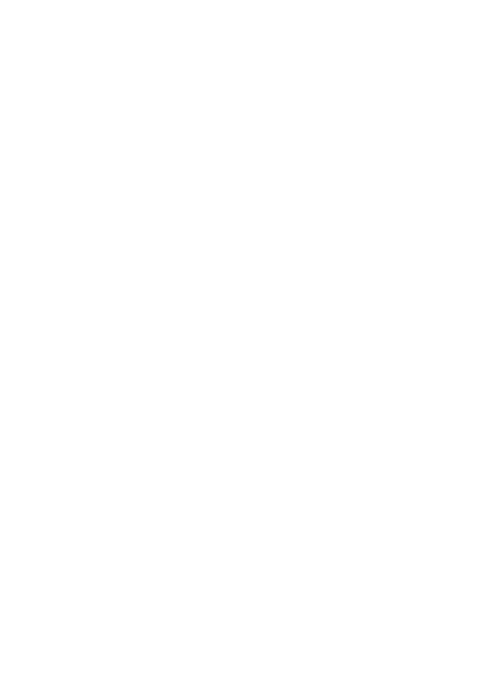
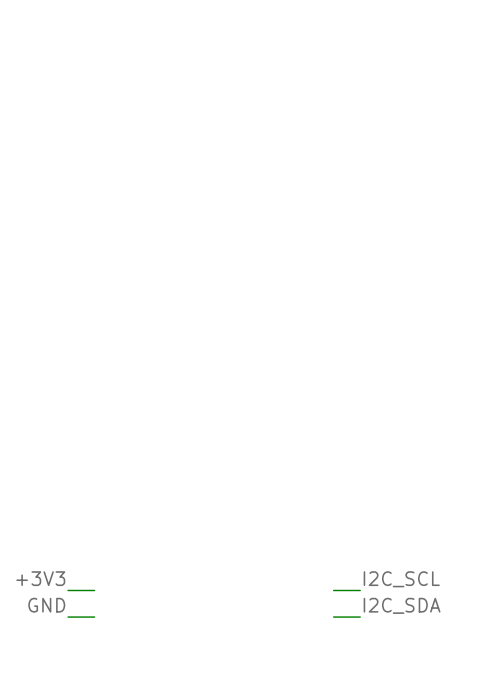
label: none -> +3V3 (40, 578)
label: none -> I2C_SCL (401, 579)
wire: none -> (68, 590) (94, 590)
wire: none -> (333, 590) (360, 590)
label: none -> GND (46, 605)
label: none -> I2C_SDA (402, 605)
wire: none -> (68, 617) (94, 617)
wire: none -> (333, 617) (360, 617)

